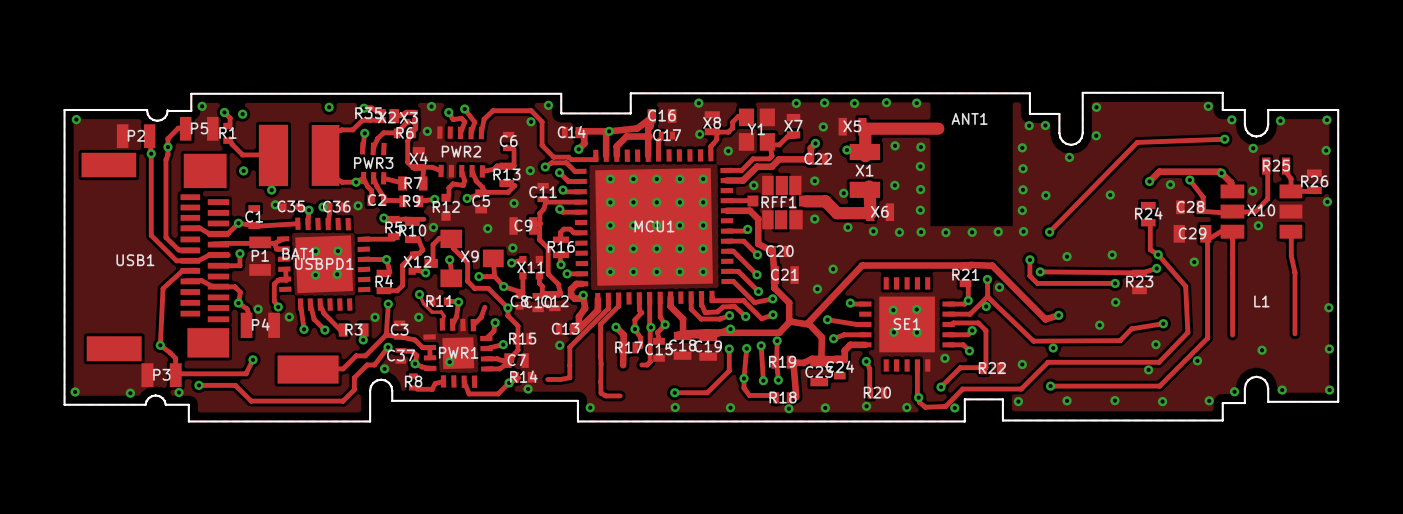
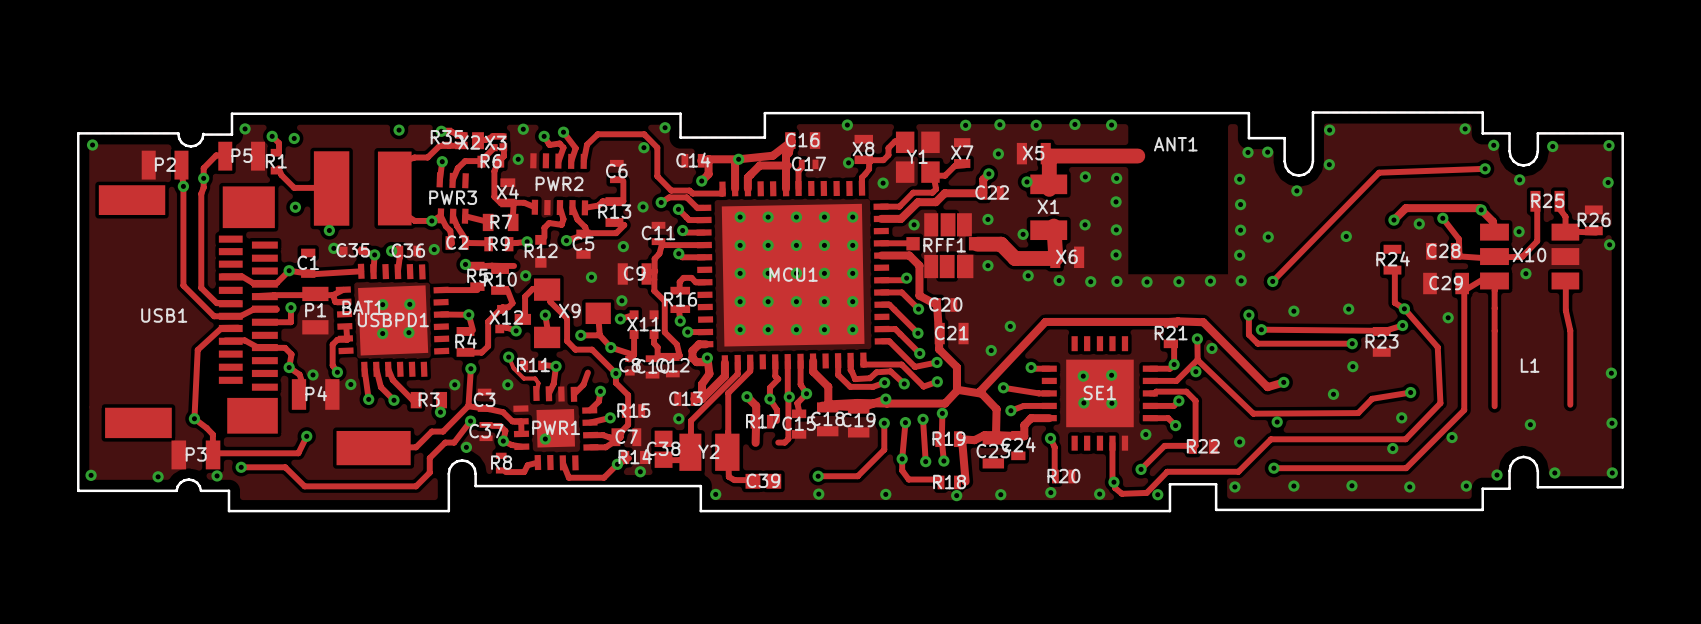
C38: none -> (663, 449)
Y2: none -> (709, 452)
C39: none -> (763, 481)

